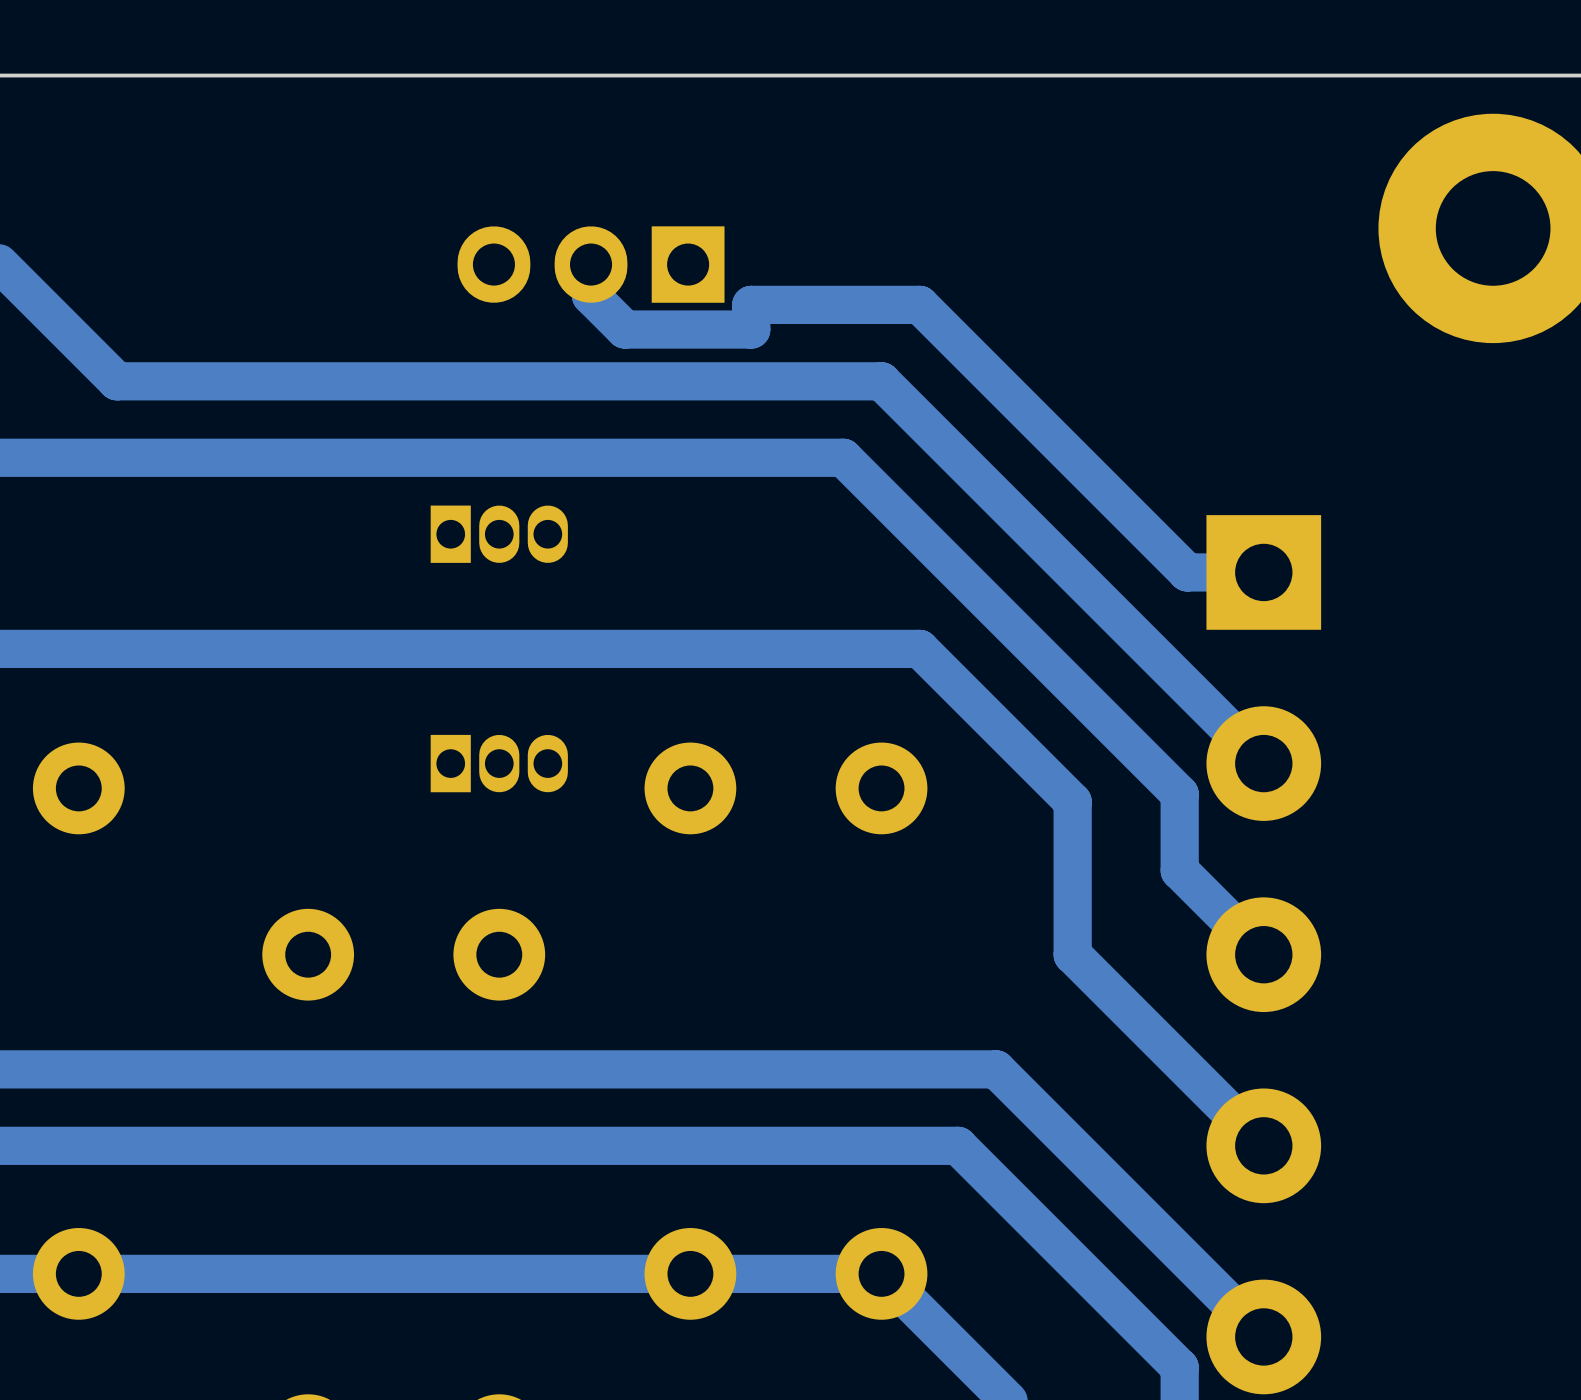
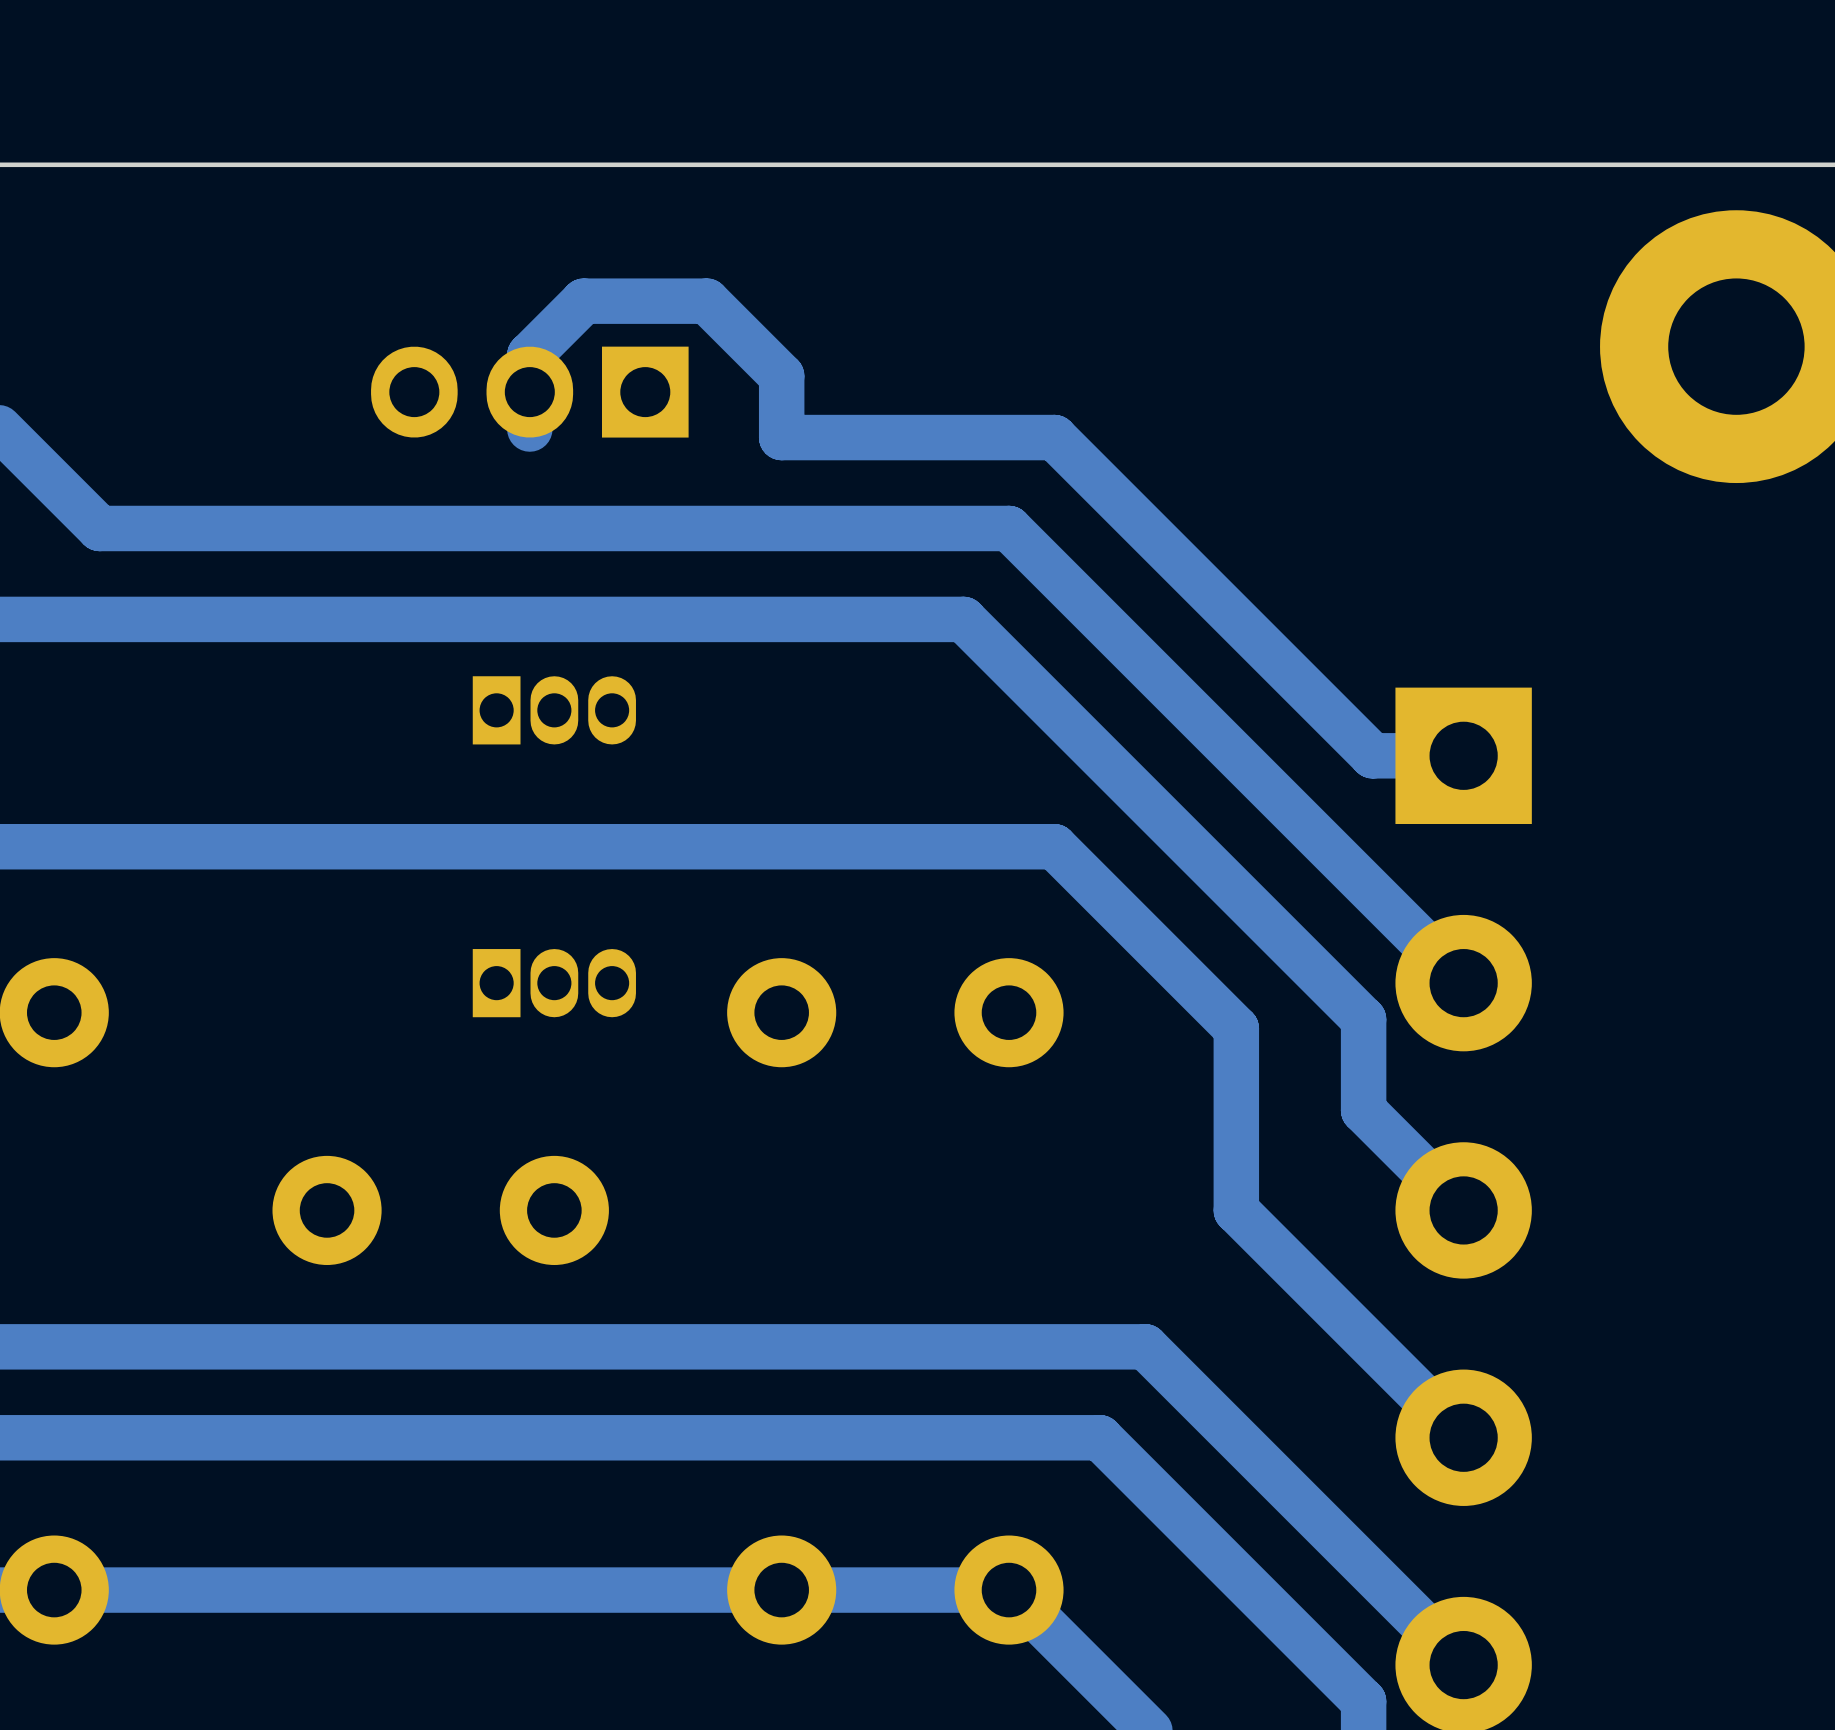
track: (591, 264) (591, 295) (624, 329) (751, 329) (751, 304) -> (529, 429) (529, 355) (583, 301) (706, 301) (781, 376) (781, 437) (854, 437)
part position: (591, 264) -> (529, 392)

